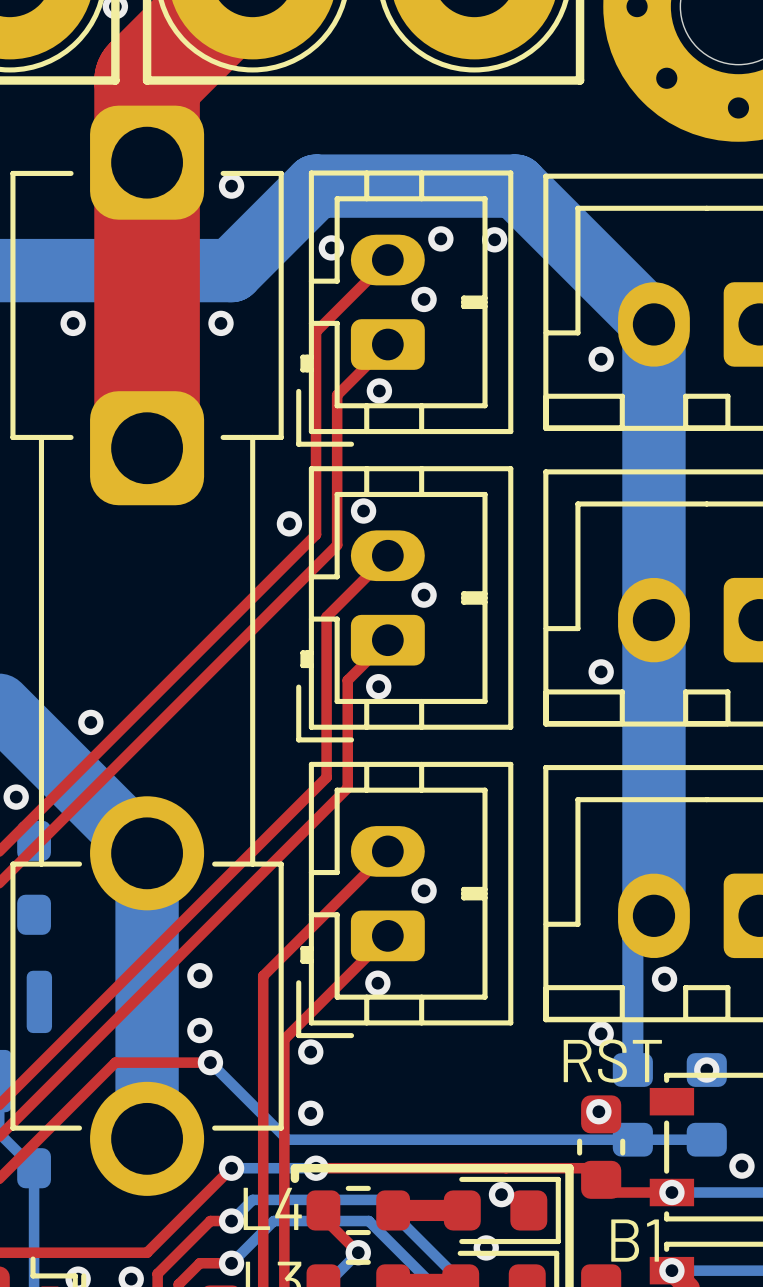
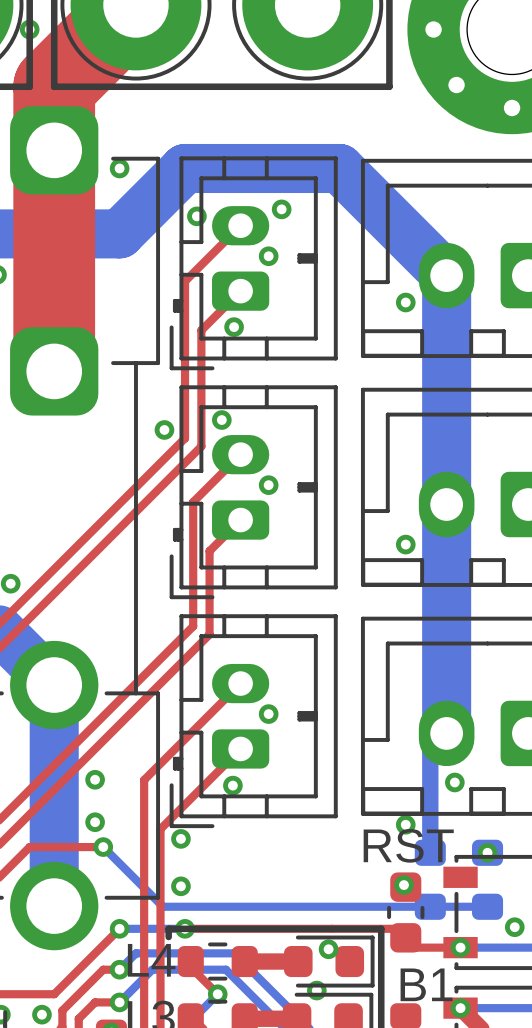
via: (494, 239) -> none
via: (221, 323) -> none
via: (378, 686) -> none

